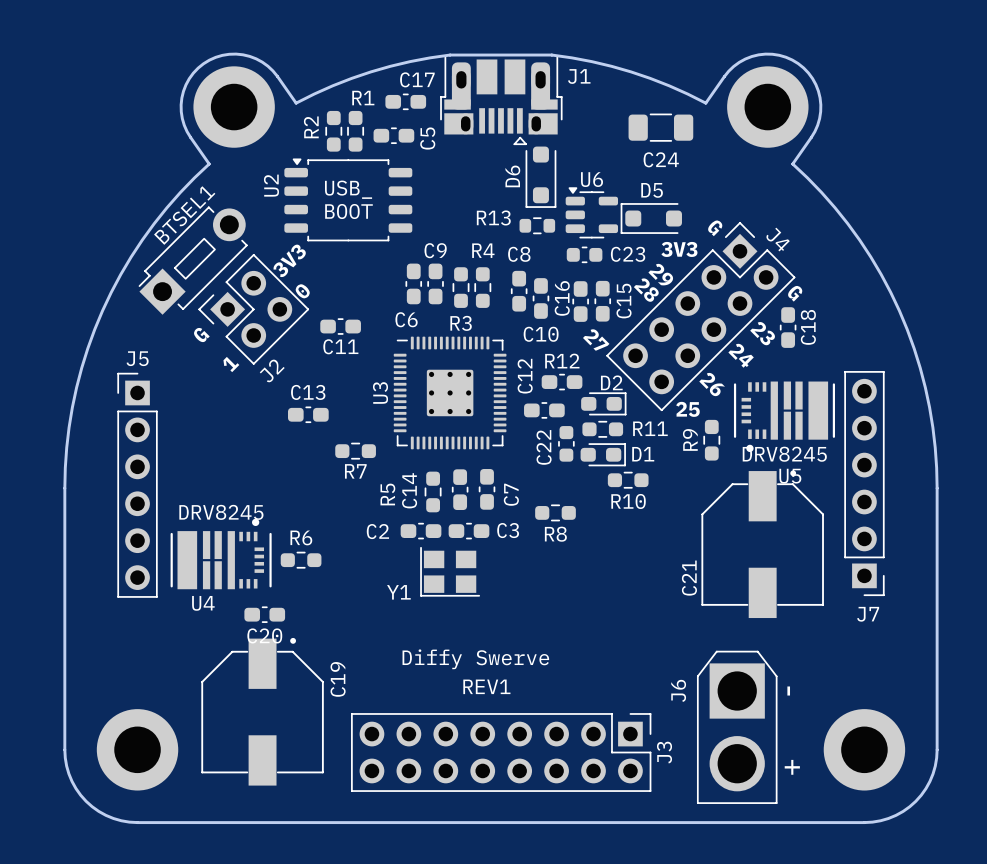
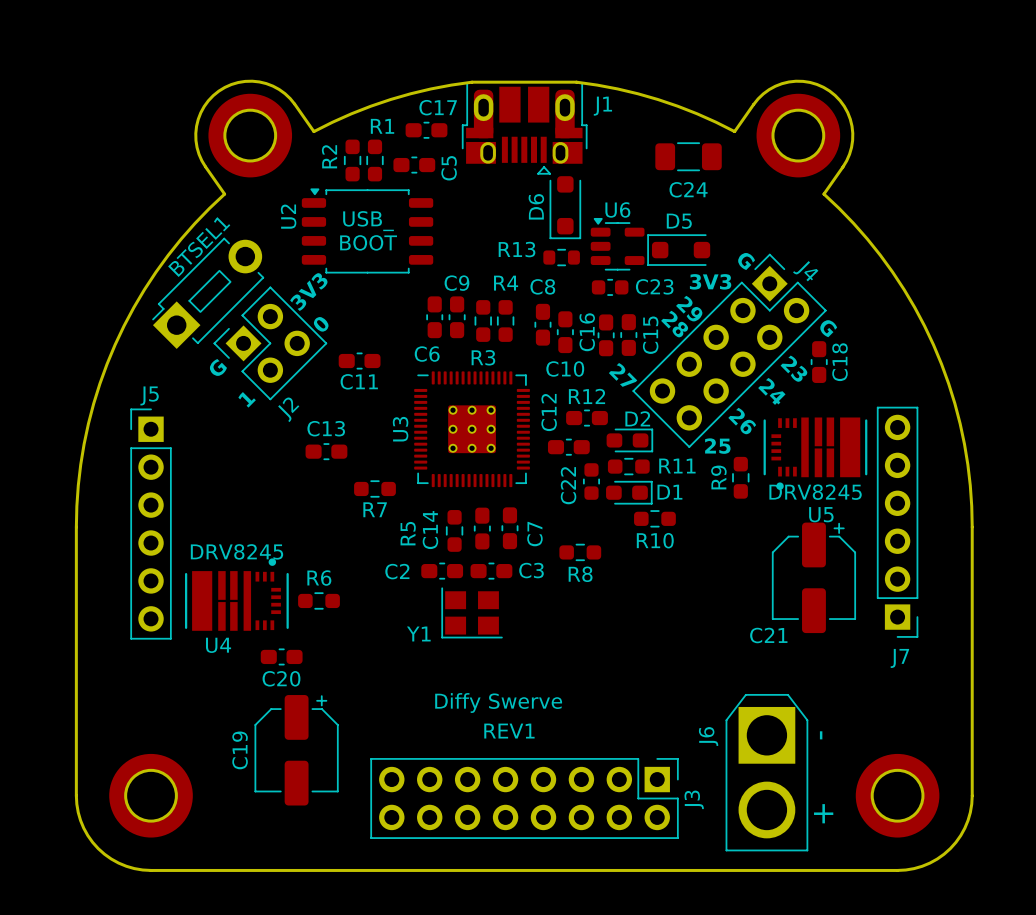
C21 footprint: [701, 470, 824, 619] -> [771, 522, 857, 634]
C21 name position: C21 (689, 578) -> C21 (768, 635)
C19 footprint: [201, 637, 324, 786] -> [254, 695, 339, 806]
C19 name position: C19 (338, 679) -> C19 (240, 750)

